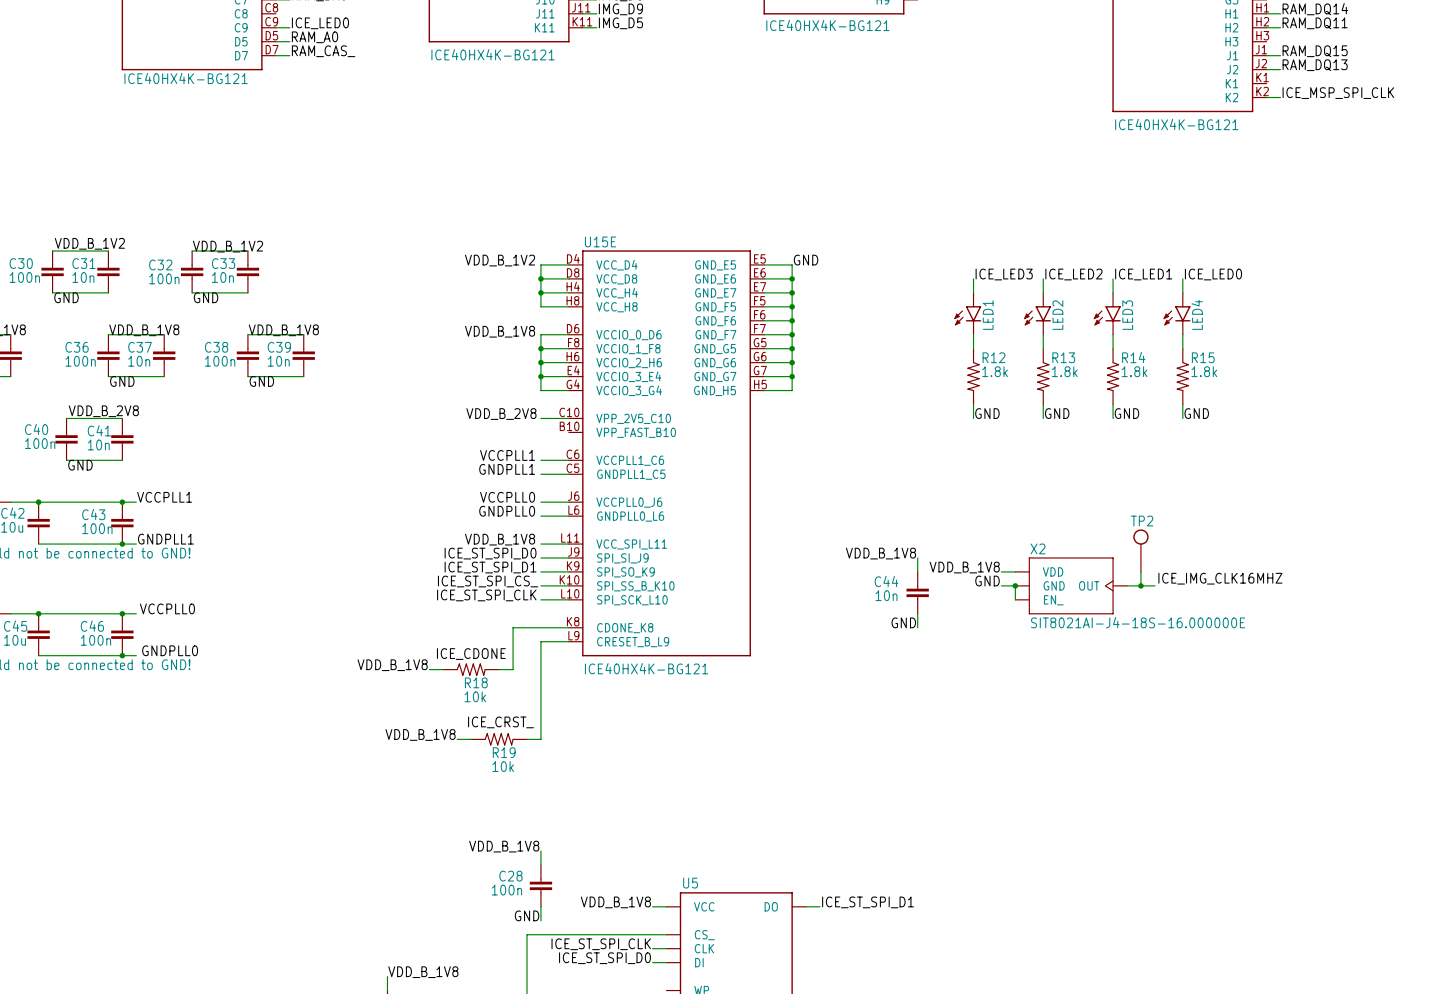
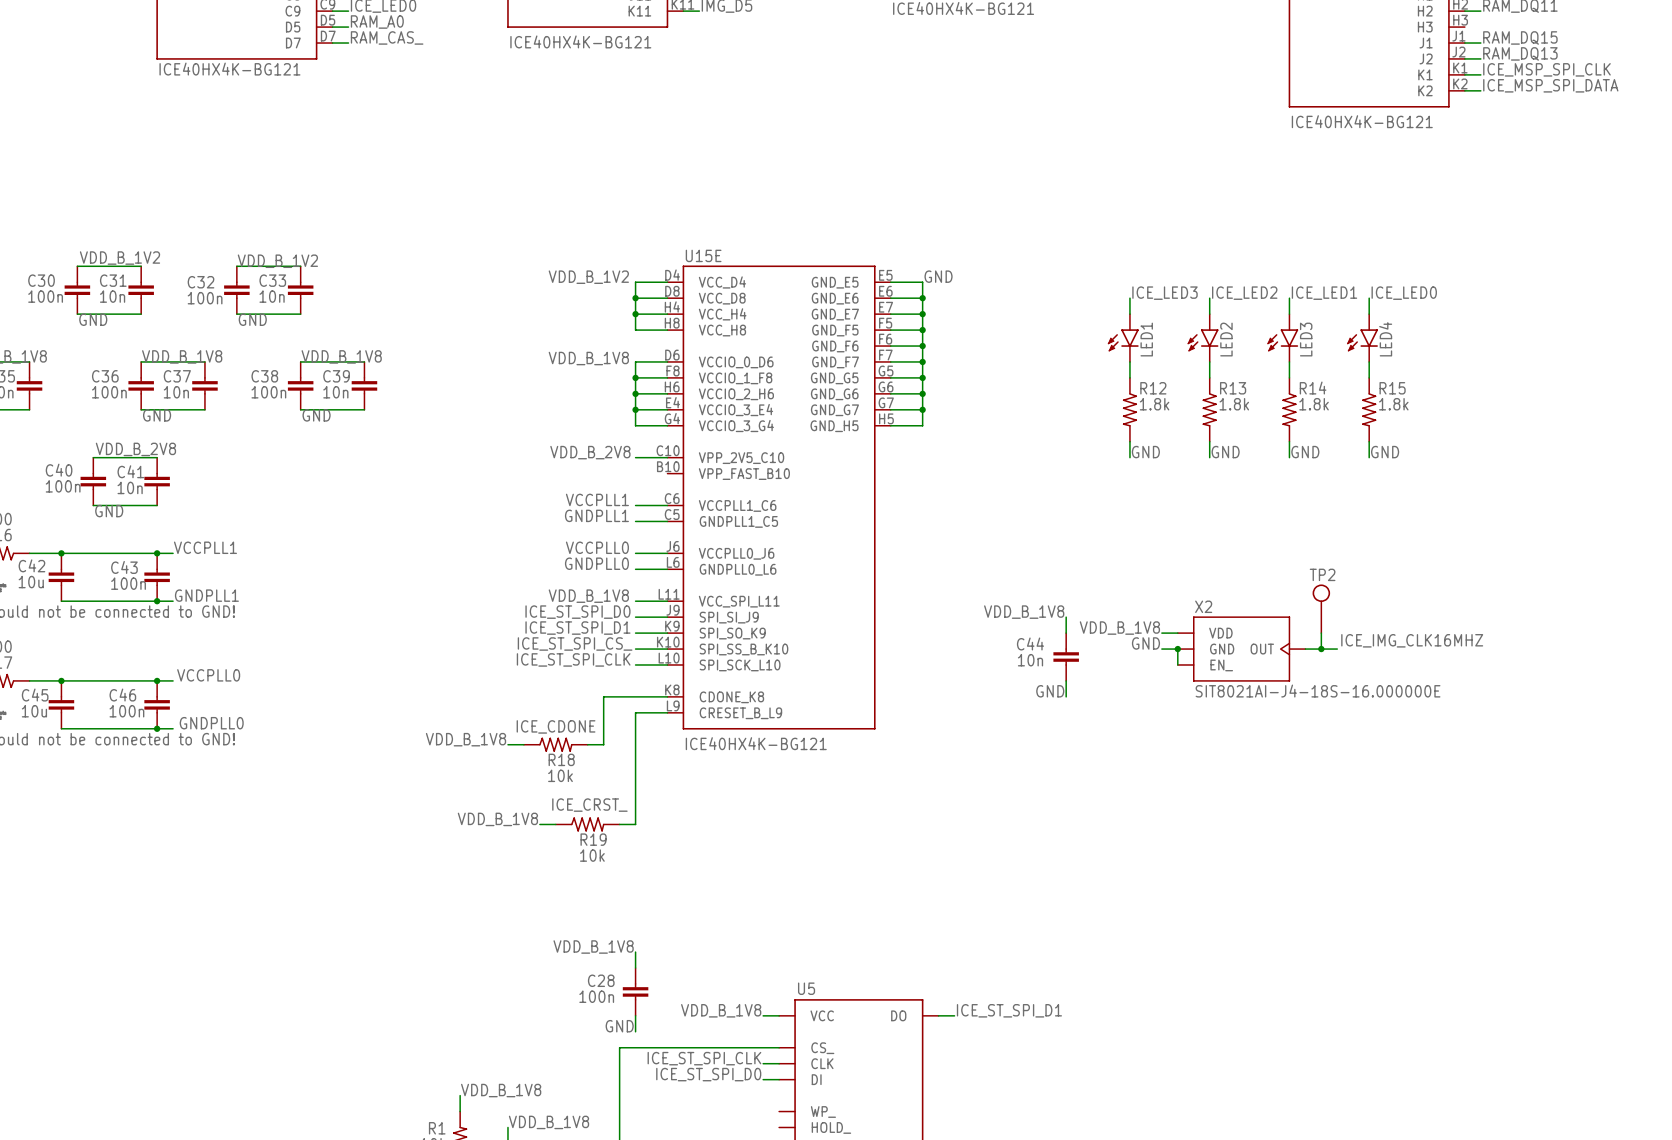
label: none -> ICE_MSP_SPI_CLK (1546, 69)
wire: none -> (1464, 74) (1480, 74)
label: ICE_MSP_SPI_CLK (1338, 93) -> ICE_MSP_SPI_DATA (1550, 85)

